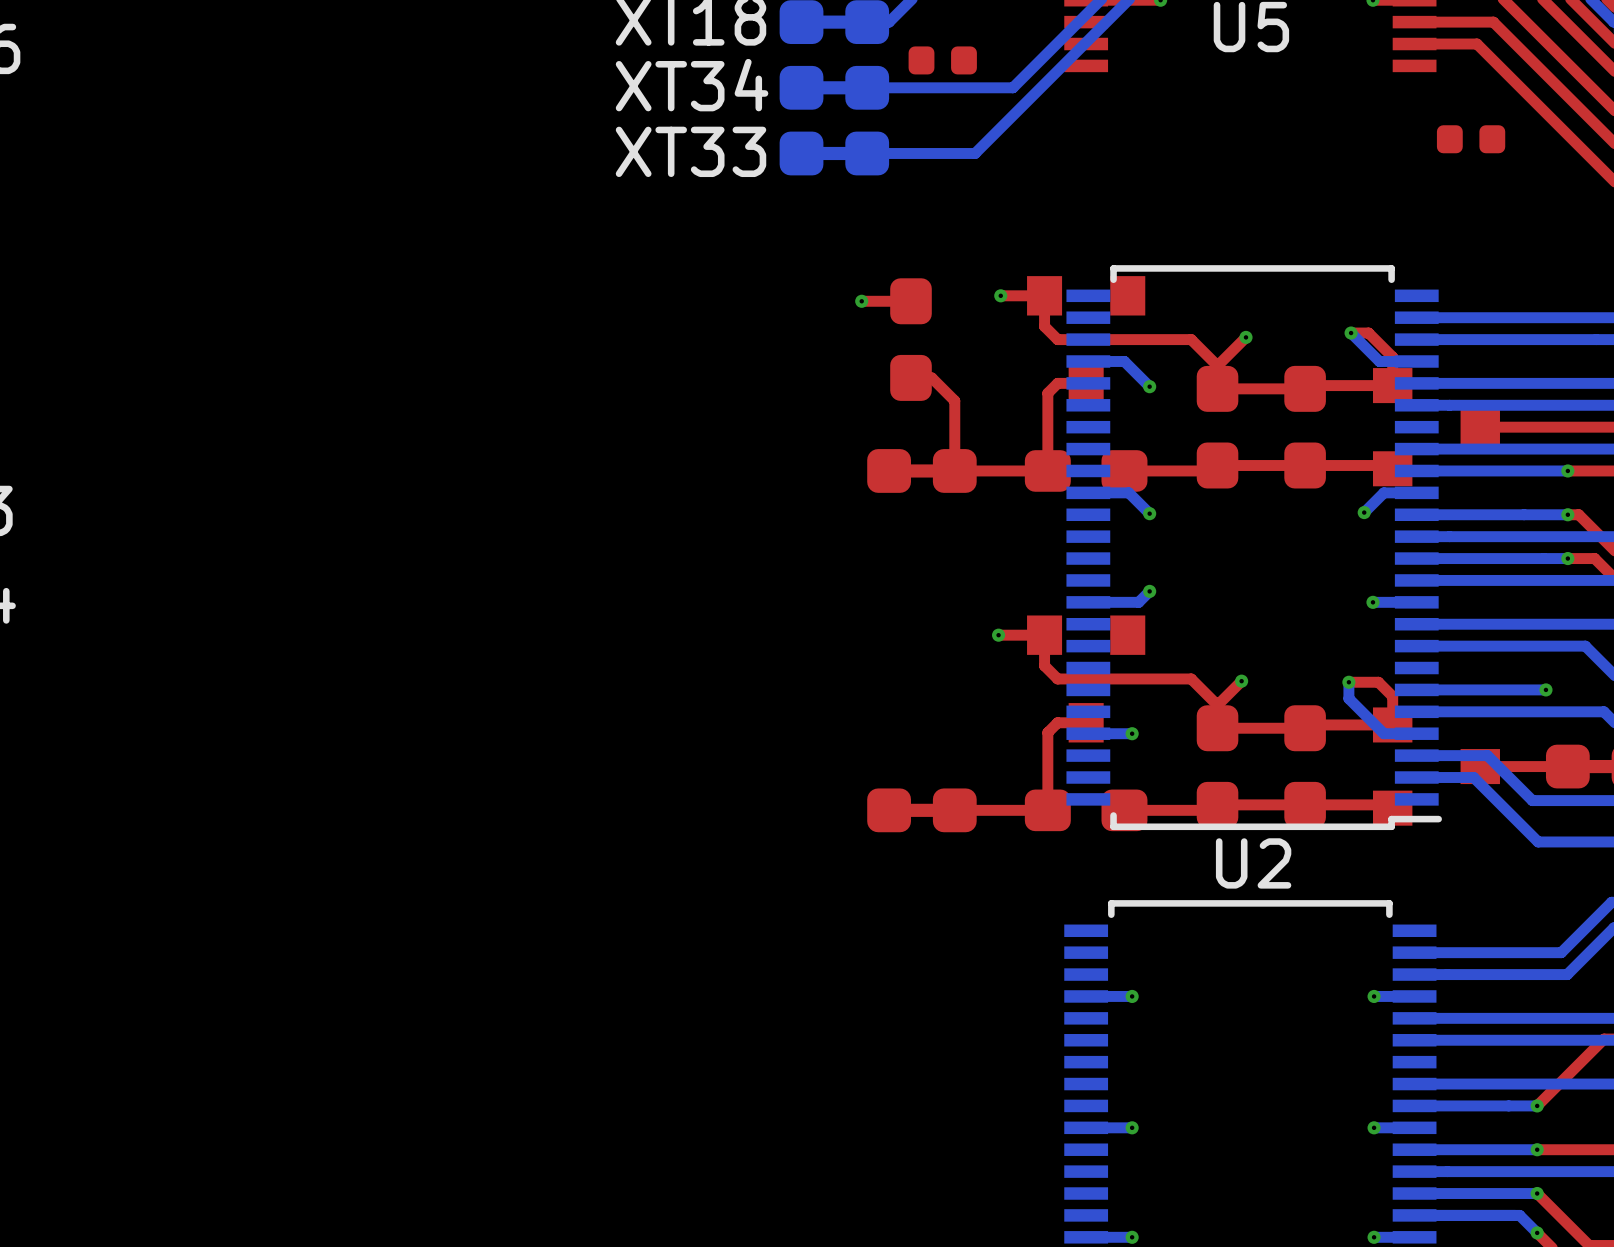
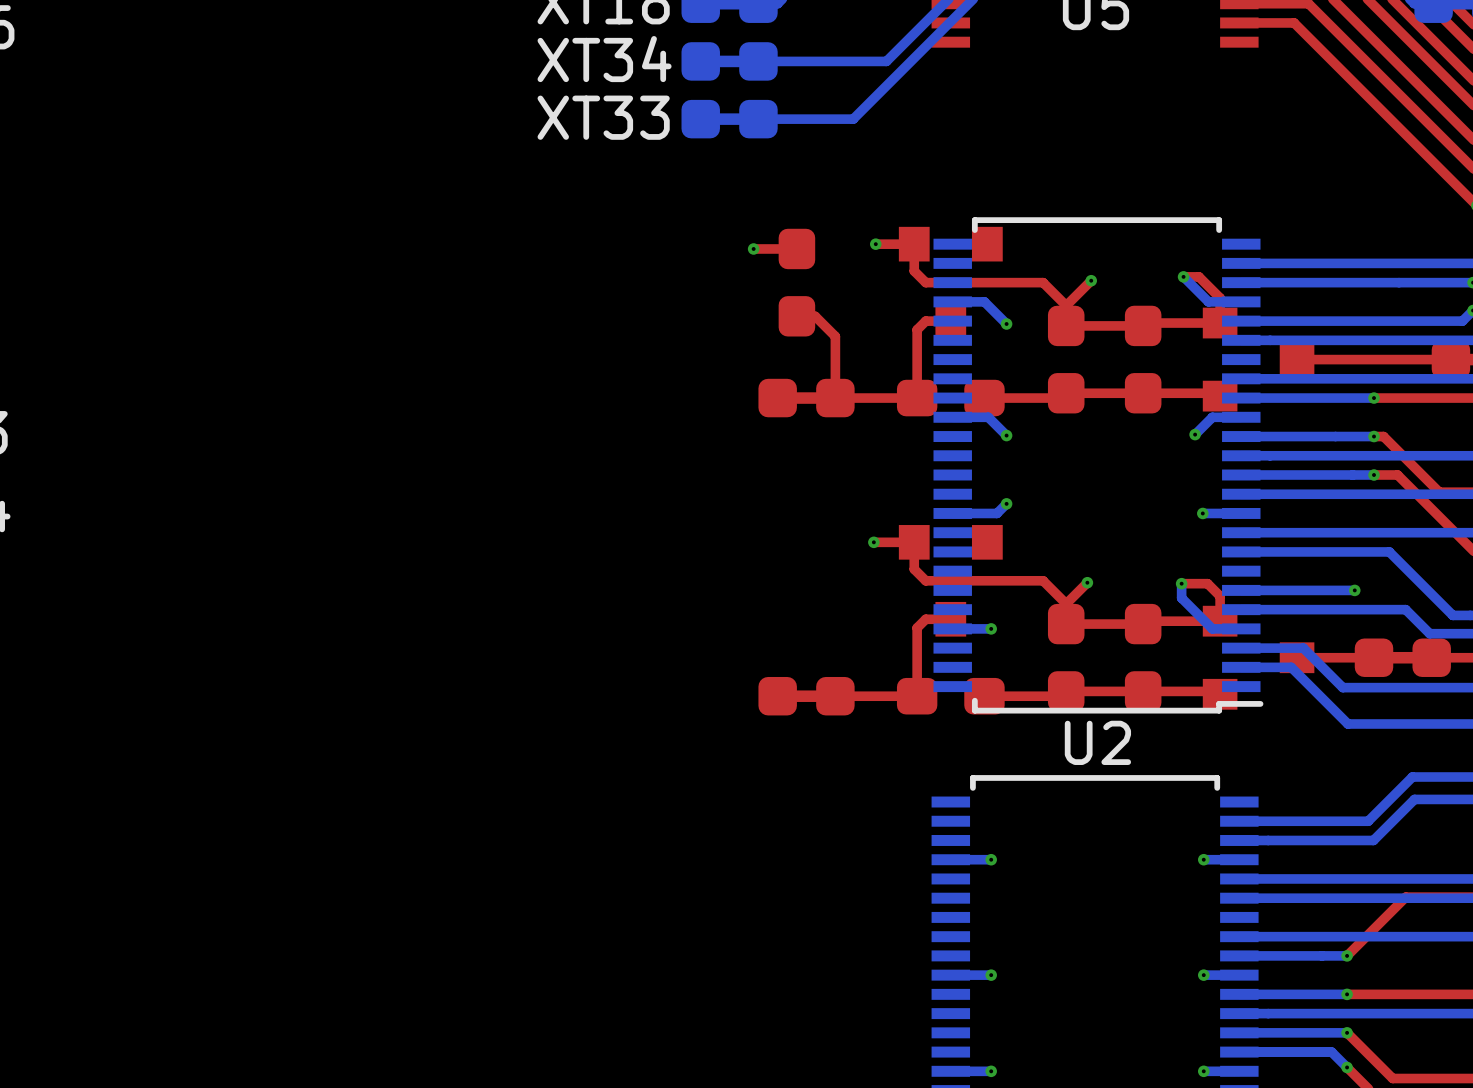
part: (942, 60) -> none
part: (1471, 139) -> none

